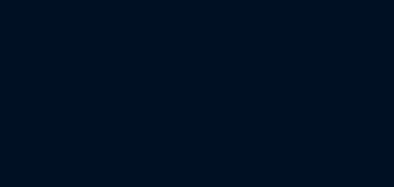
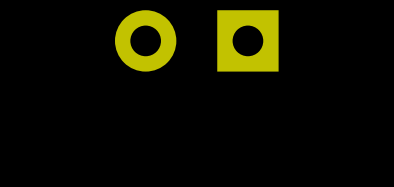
part: none -> (196, 40)

